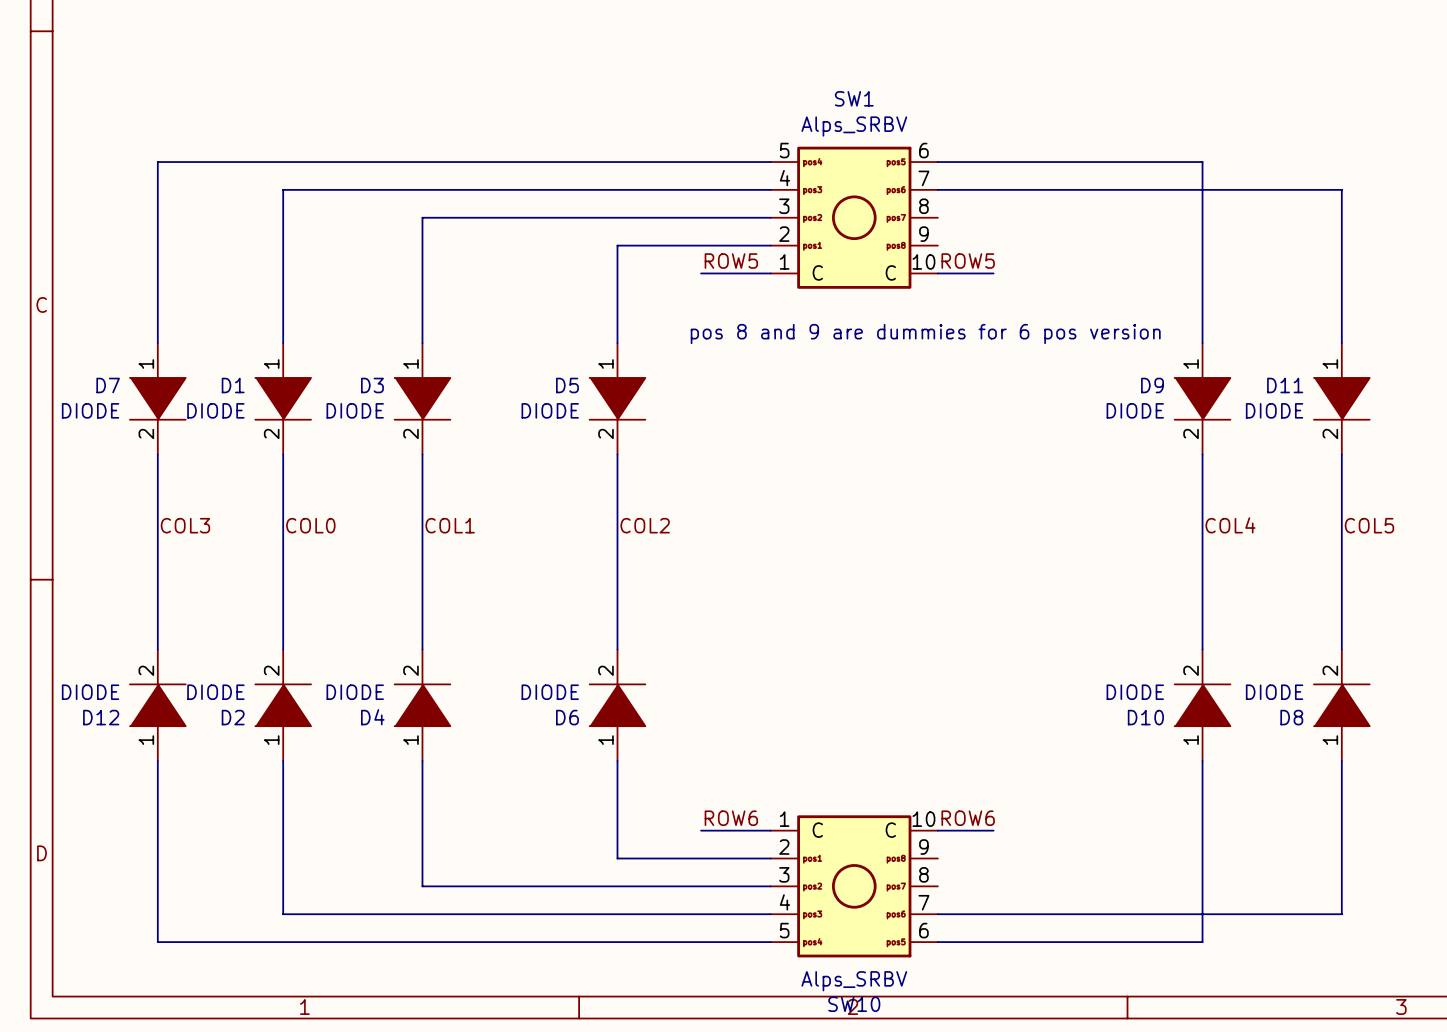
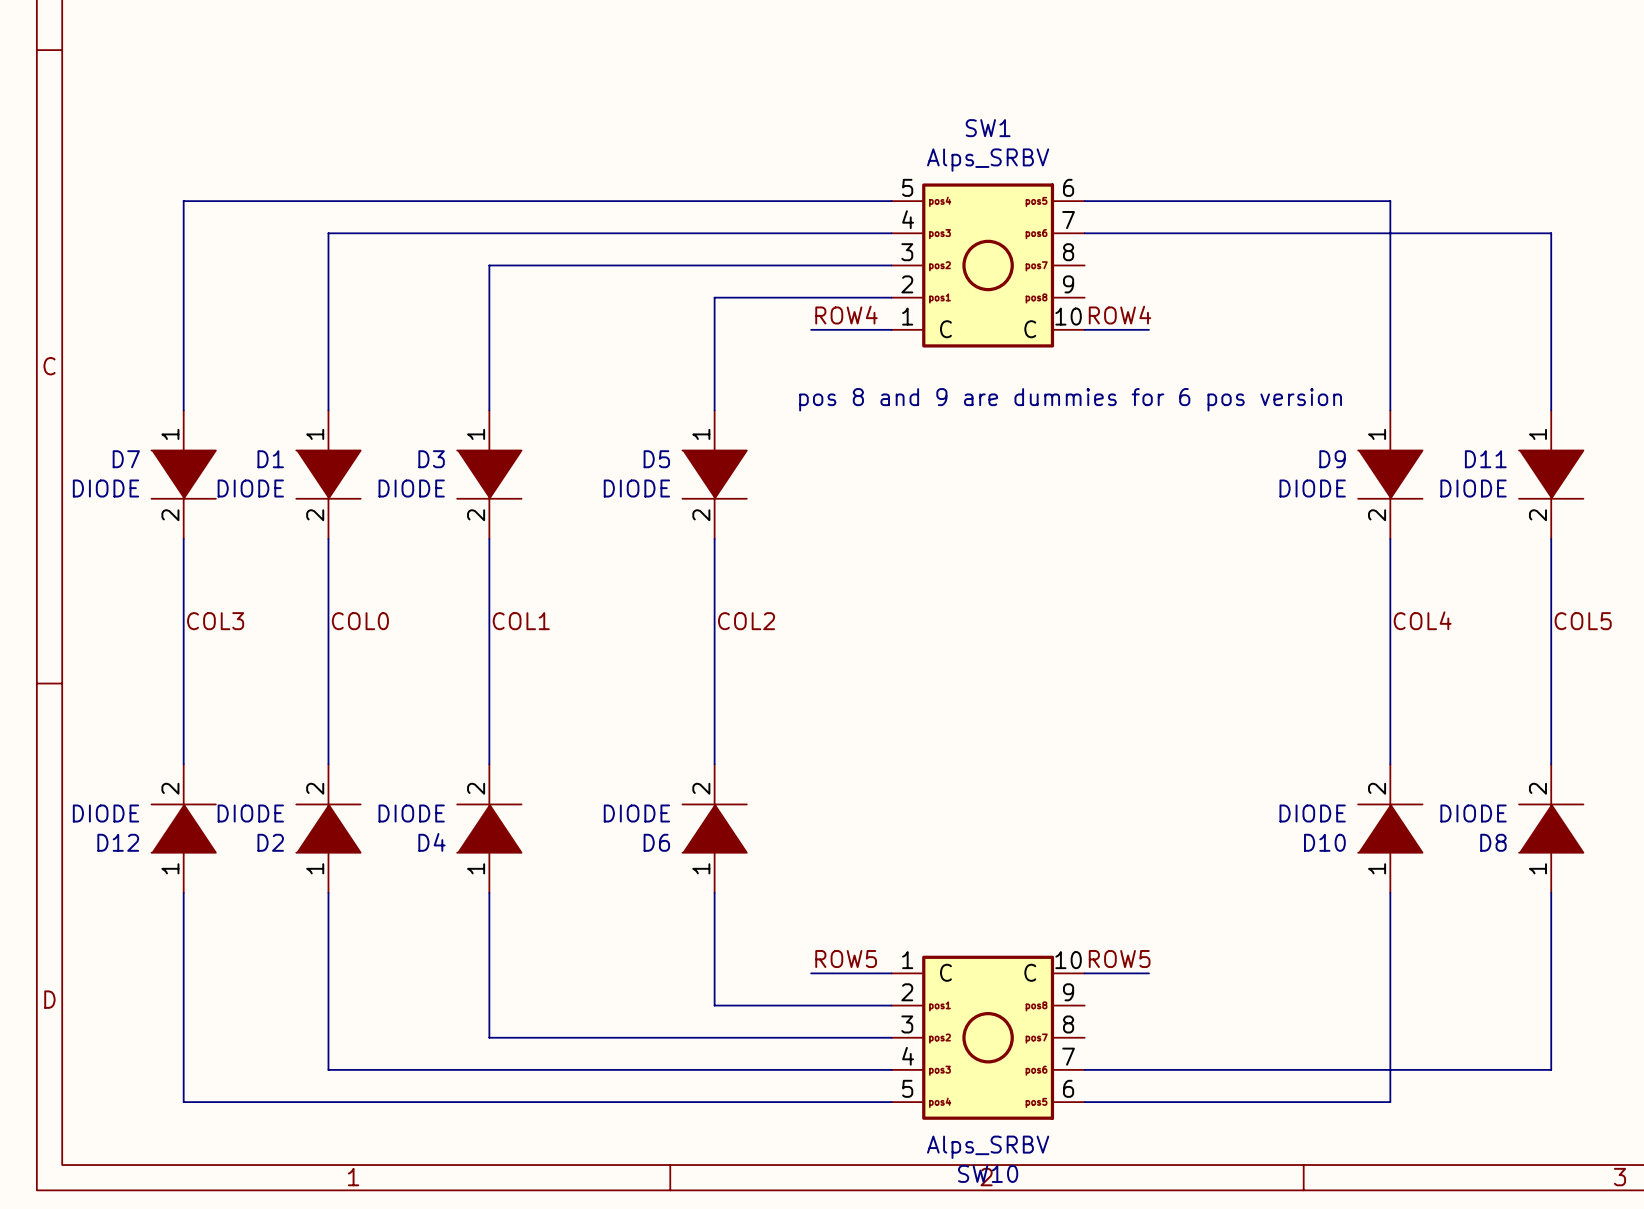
label: ROW5 (731, 261) -> ROW4 (846, 315)
label: ROW5 (968, 261) -> ROW4 (1120, 315)
label: ROW6 (731, 818) -> ROW5 (846, 959)
label: ROW6 (968, 818) -> ROW5 (1119, 959)

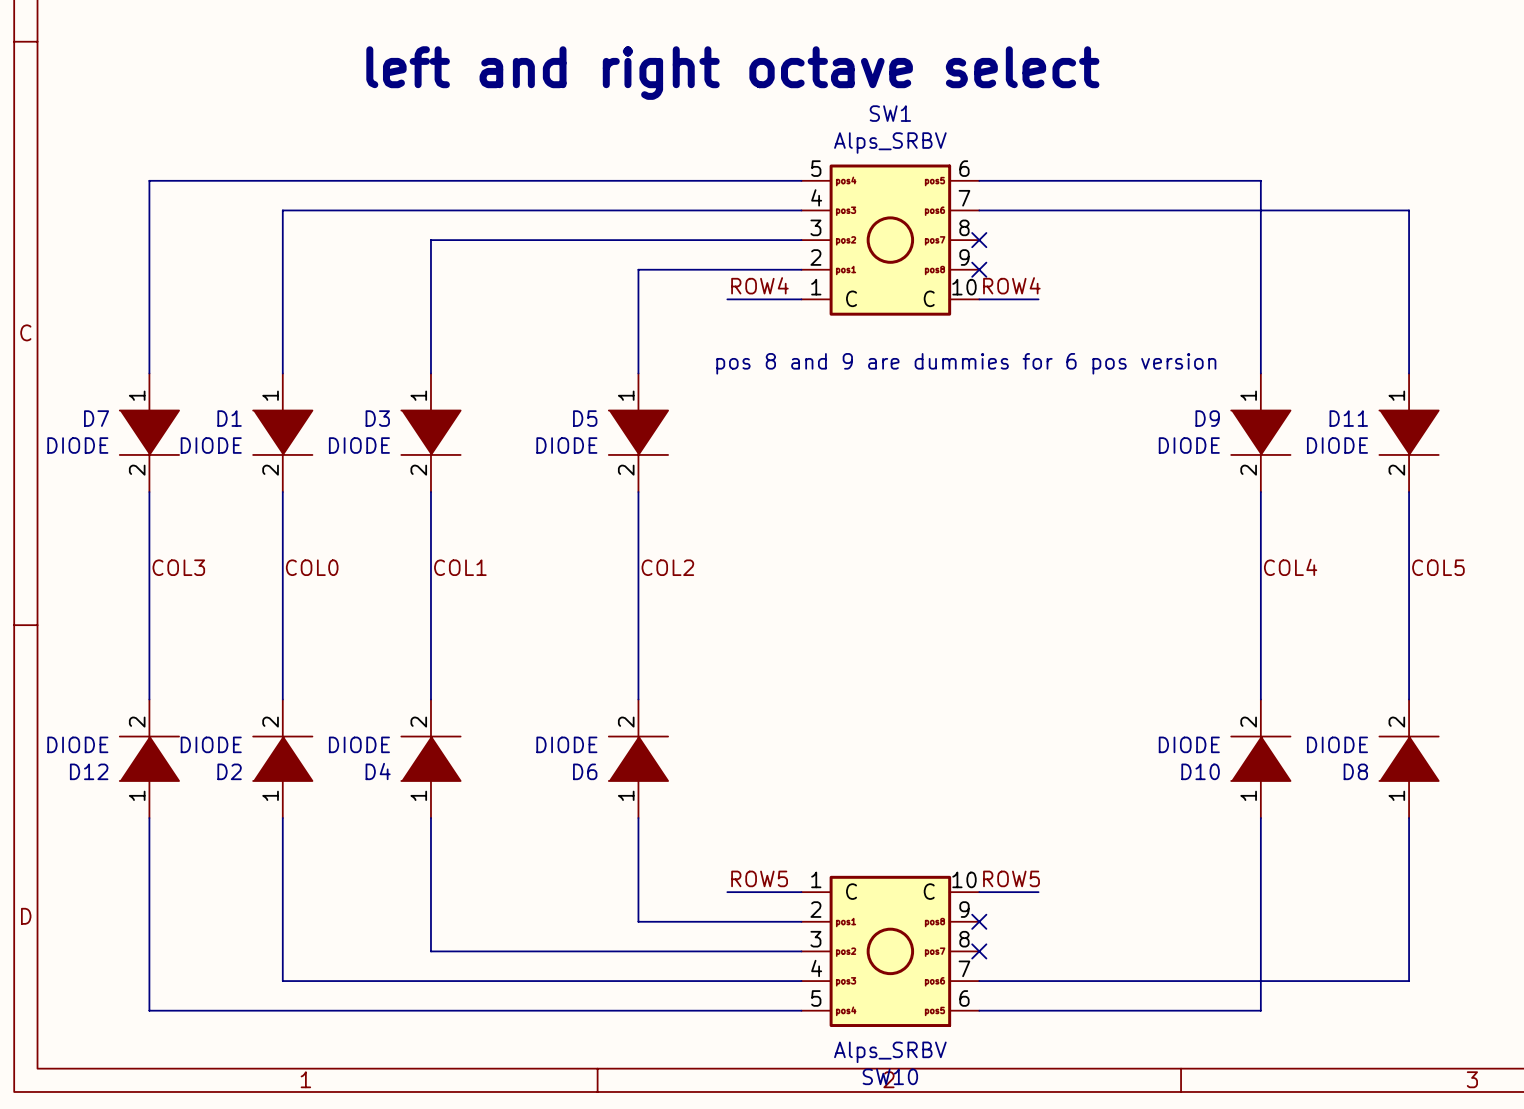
text: none -> left and right octave select (732, 73)
no-connect mark: none -> (979, 240)
no-connect mark: none -> (979, 269)
no-connect mark: none -> (979, 921)
no-connect mark: none -> (979, 951)

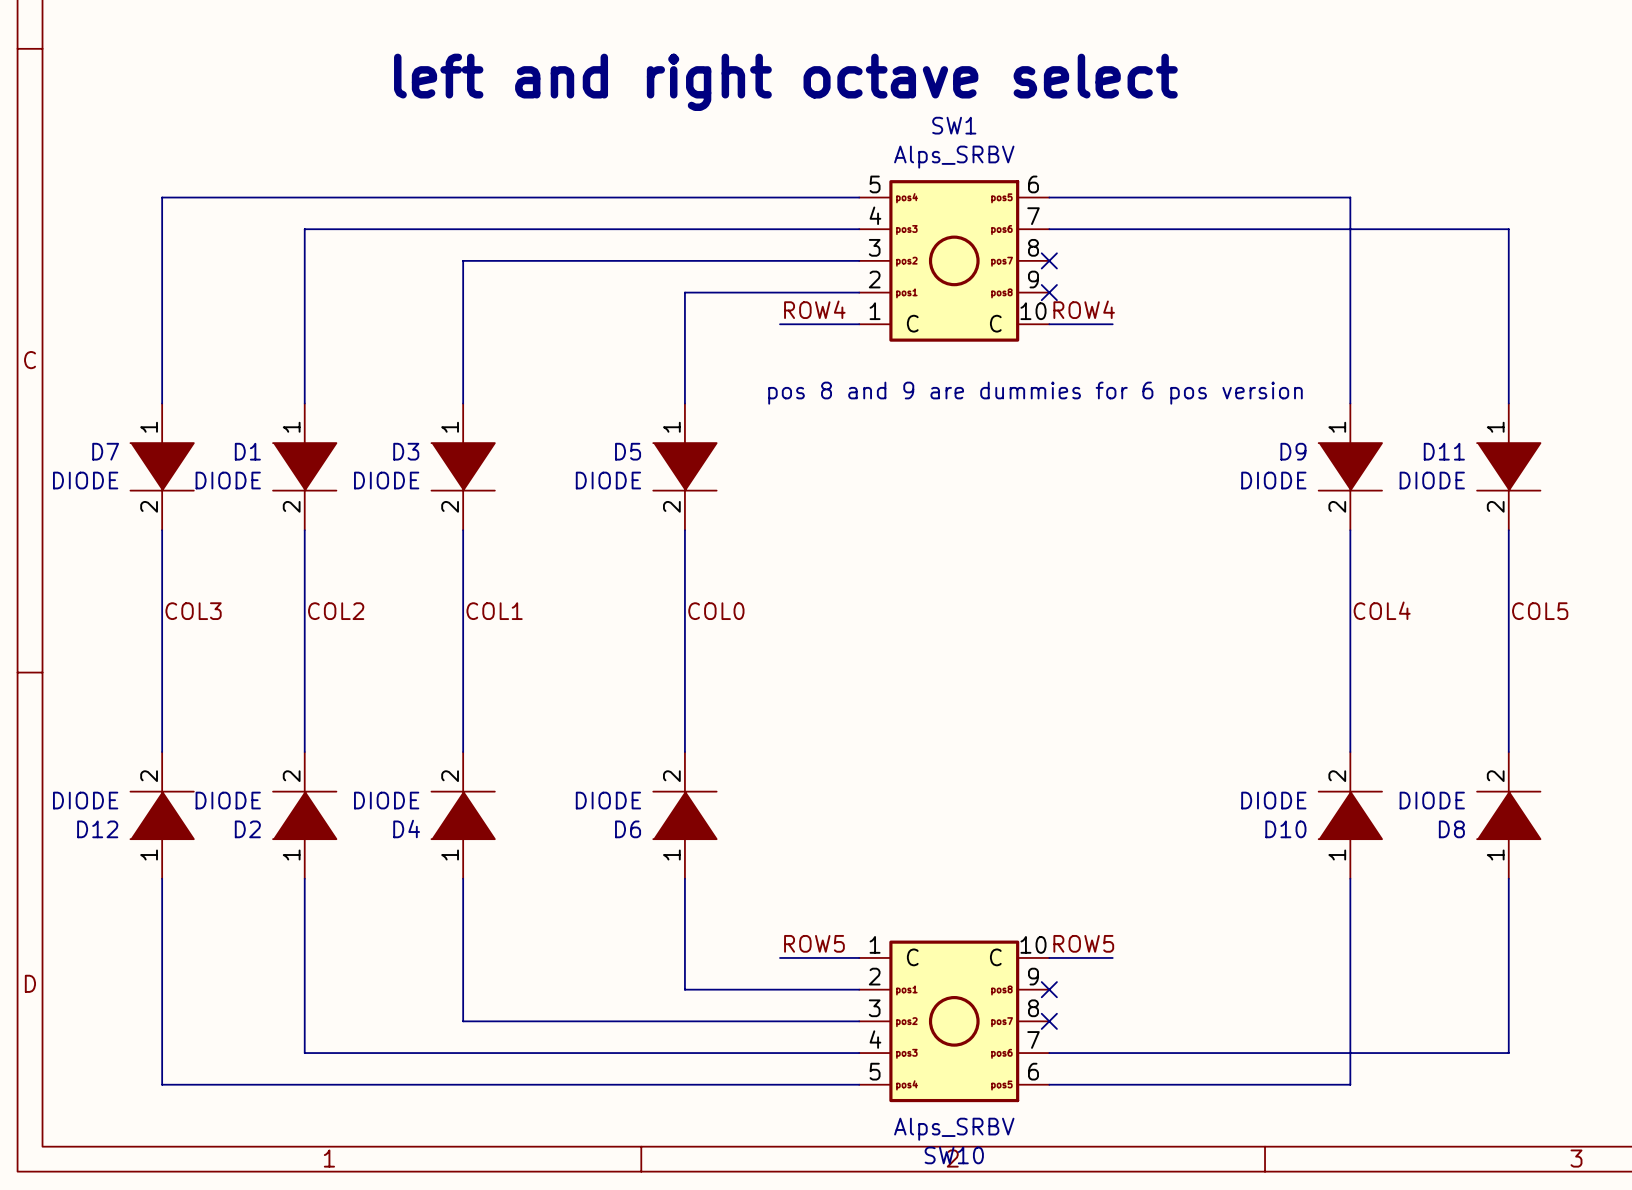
label: COL0 (312, 567) -> COL2 (336, 611)
label: COL2 (667, 567) -> COL0 (716, 611)

